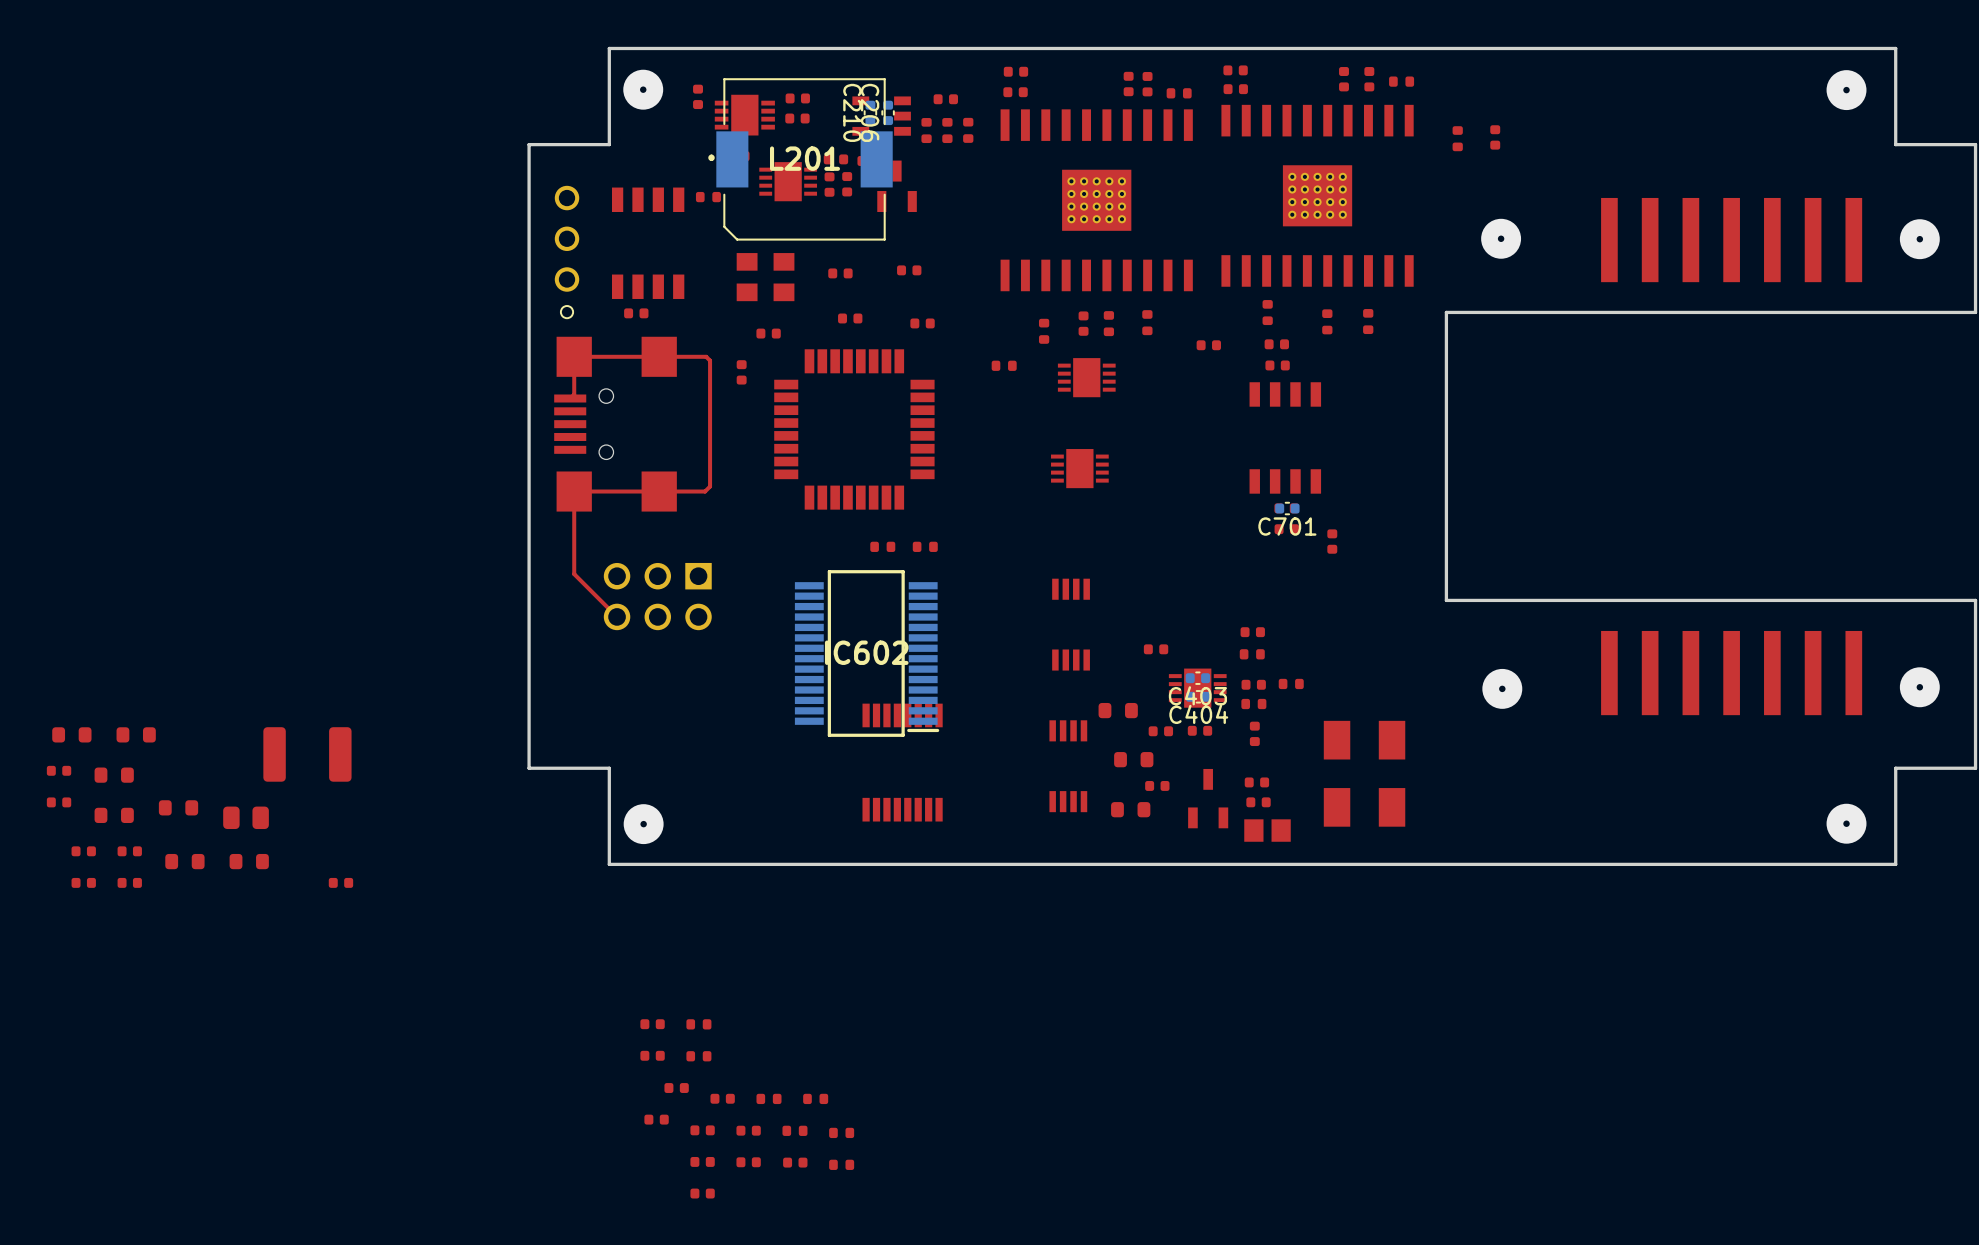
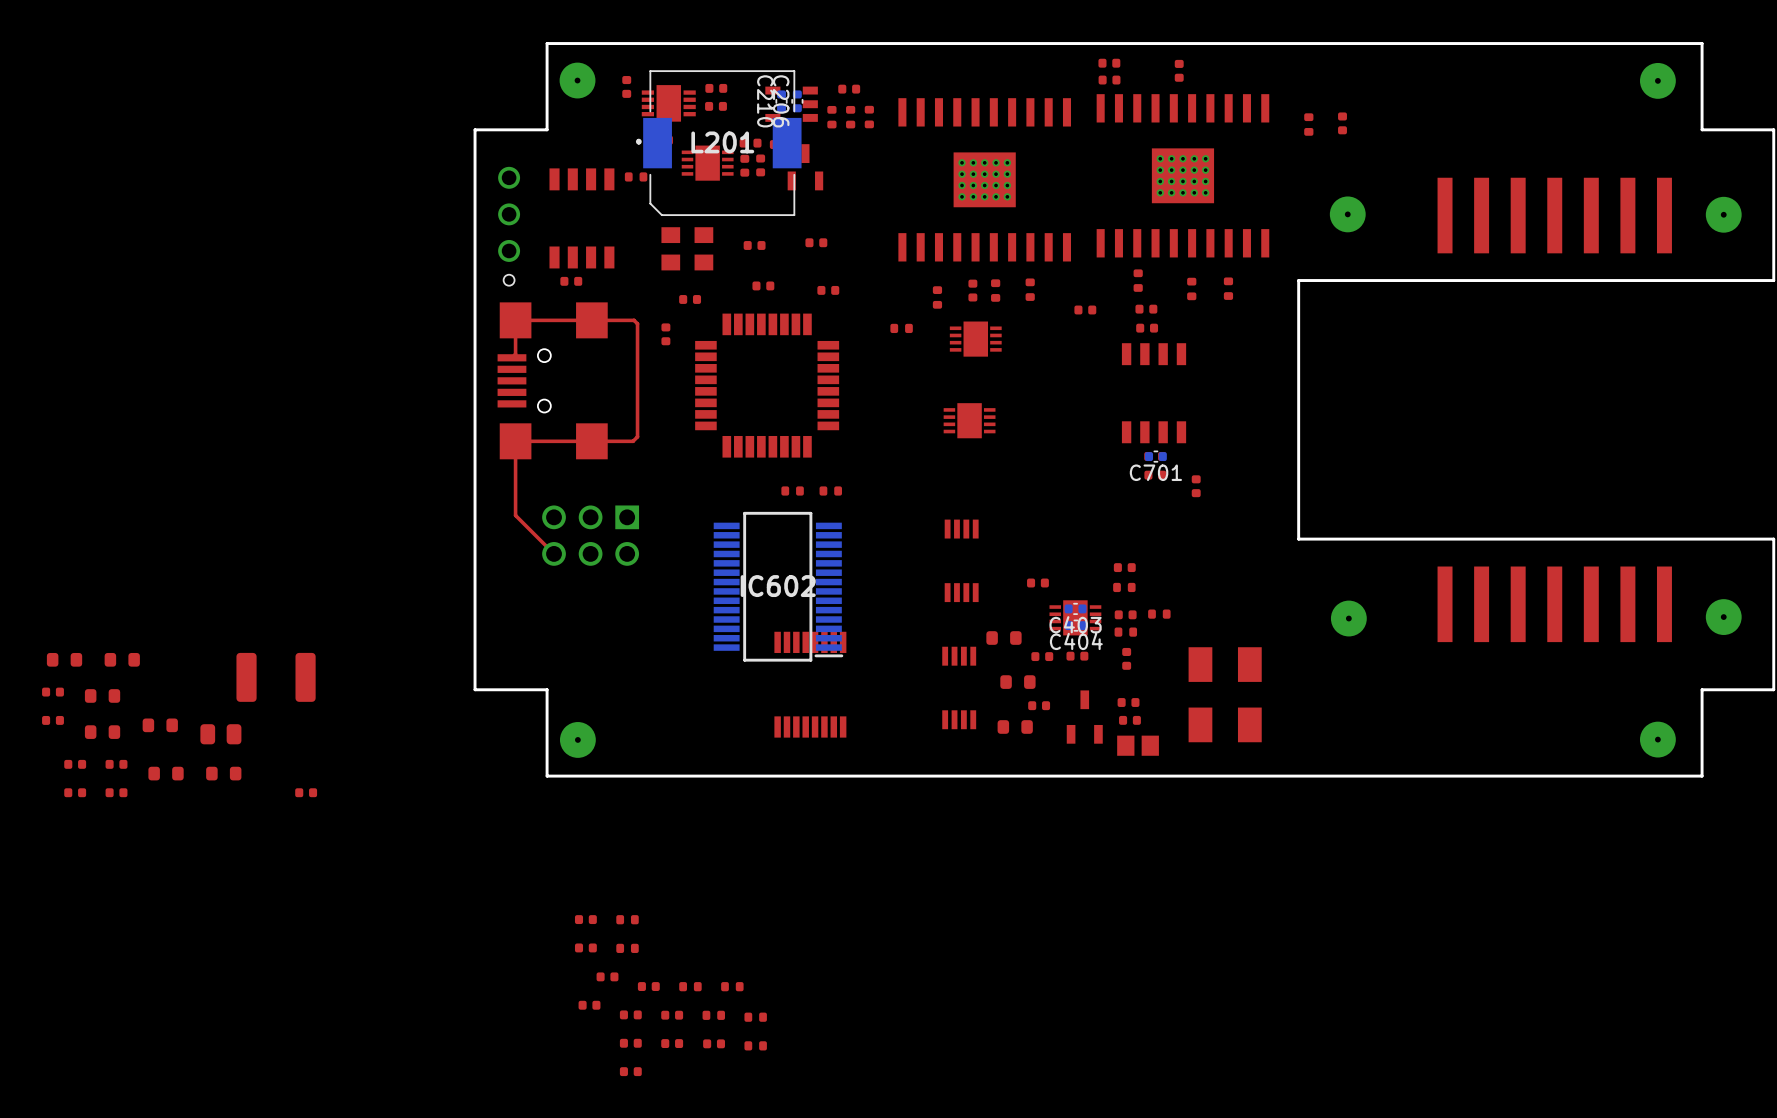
part: (1015, 71) -> none
part: none -> (1179, 70)
part: (1344, 79) -> none
part: (1369, 79) -> none
part: (1401, 81) -> none
part: (1128, 84) -> none
part: (1147, 84) -> none
part: (1015, 92) -> none
part: (1179, 93) -> none

